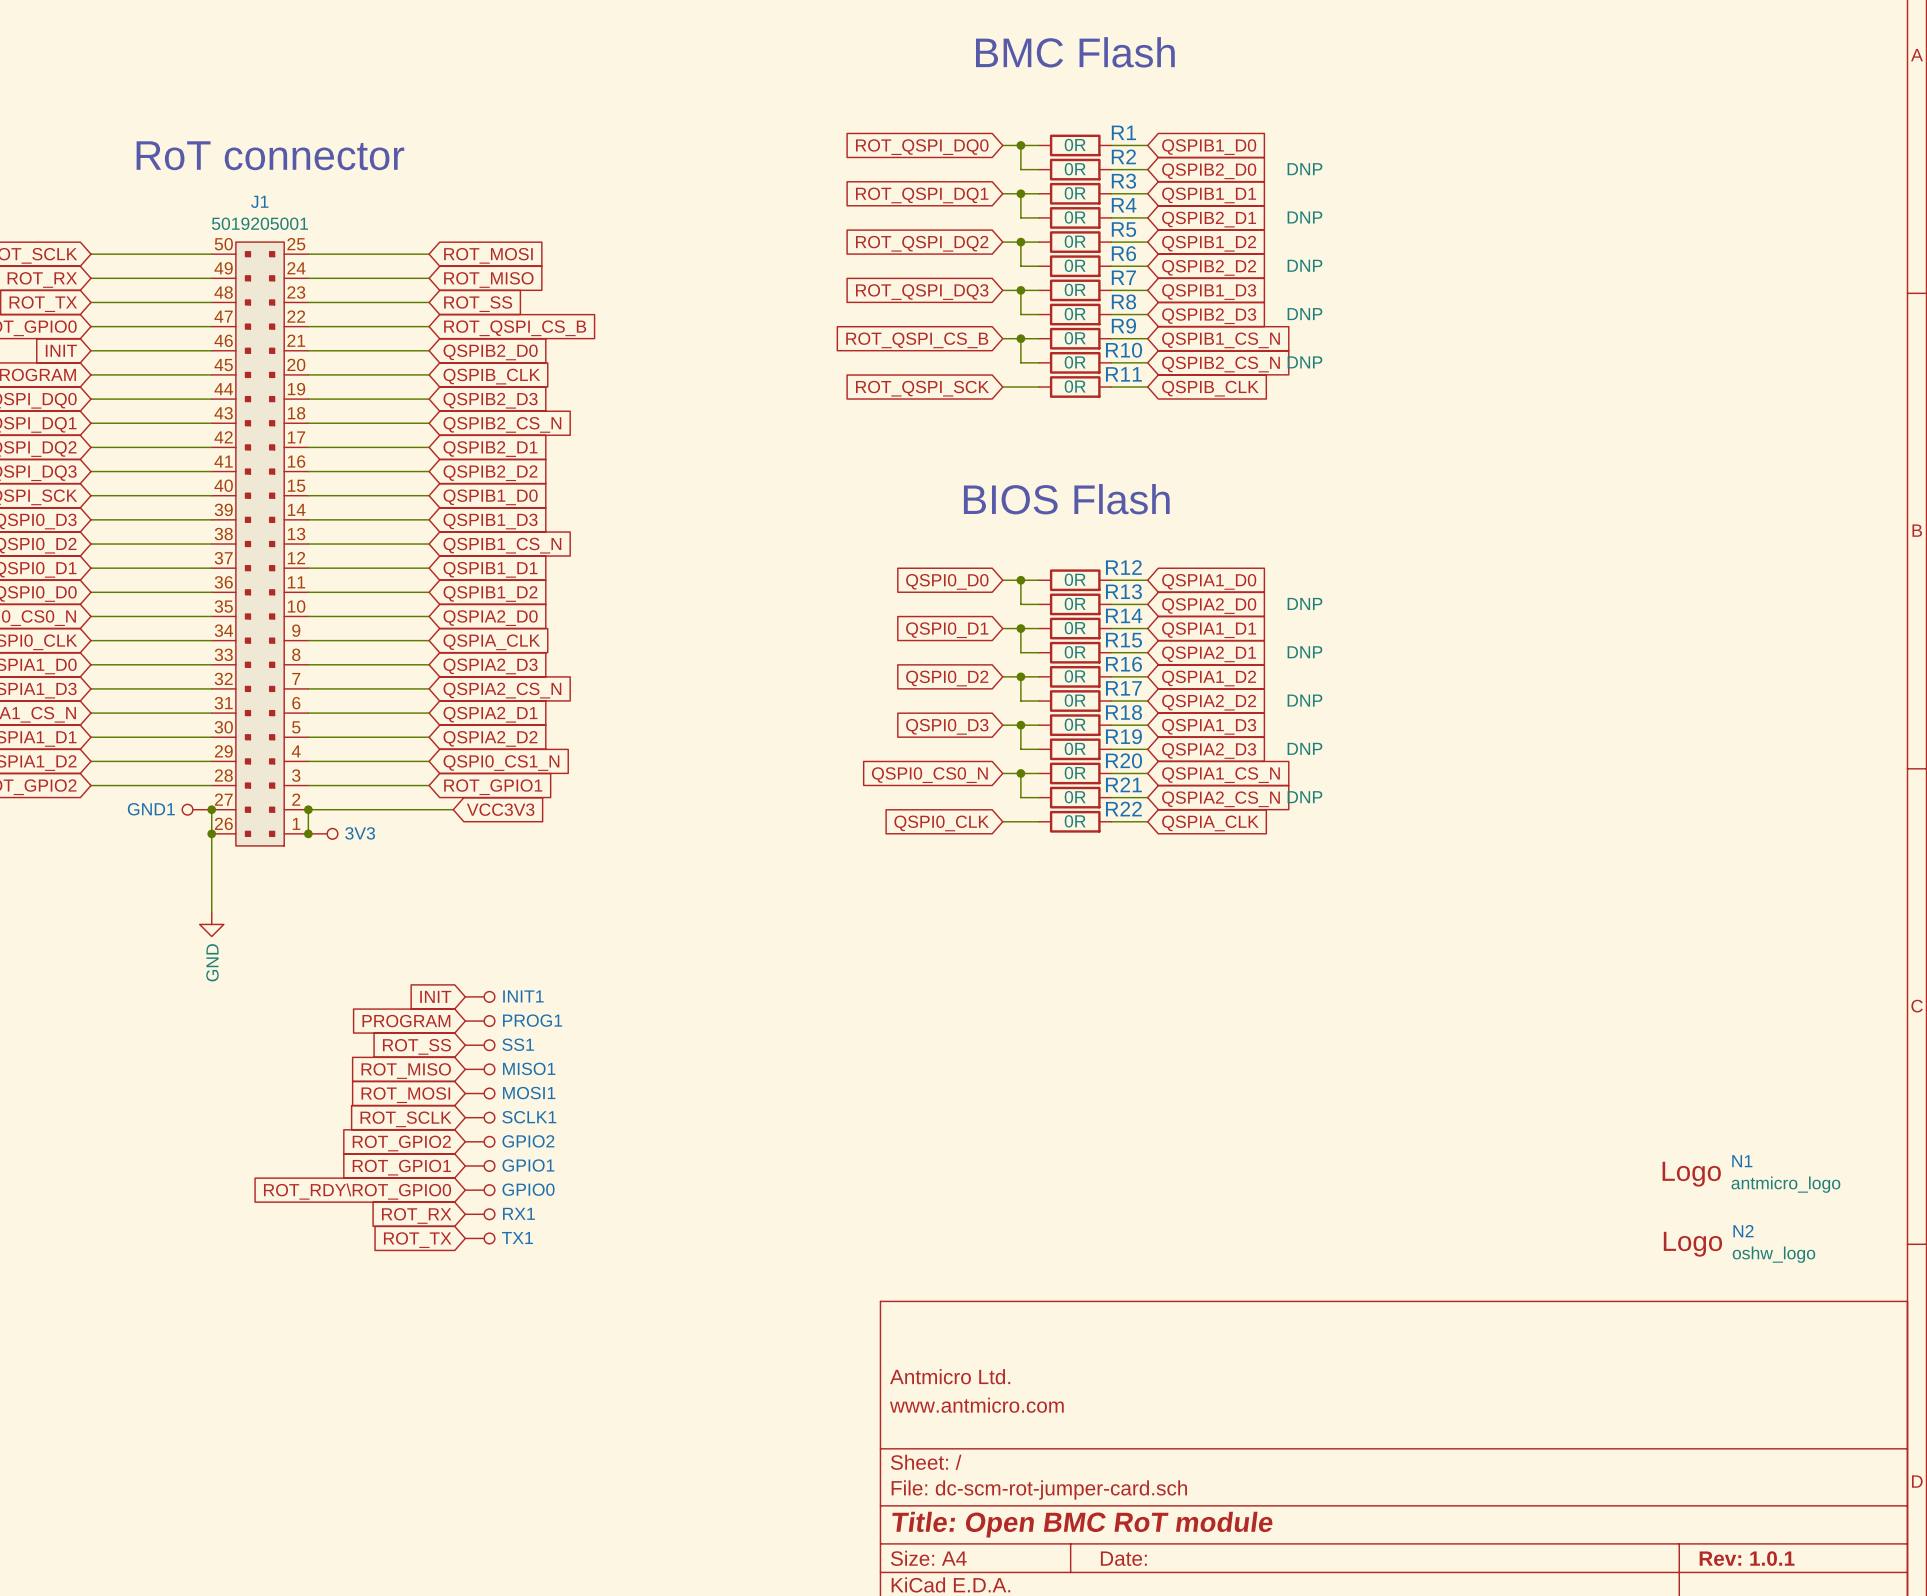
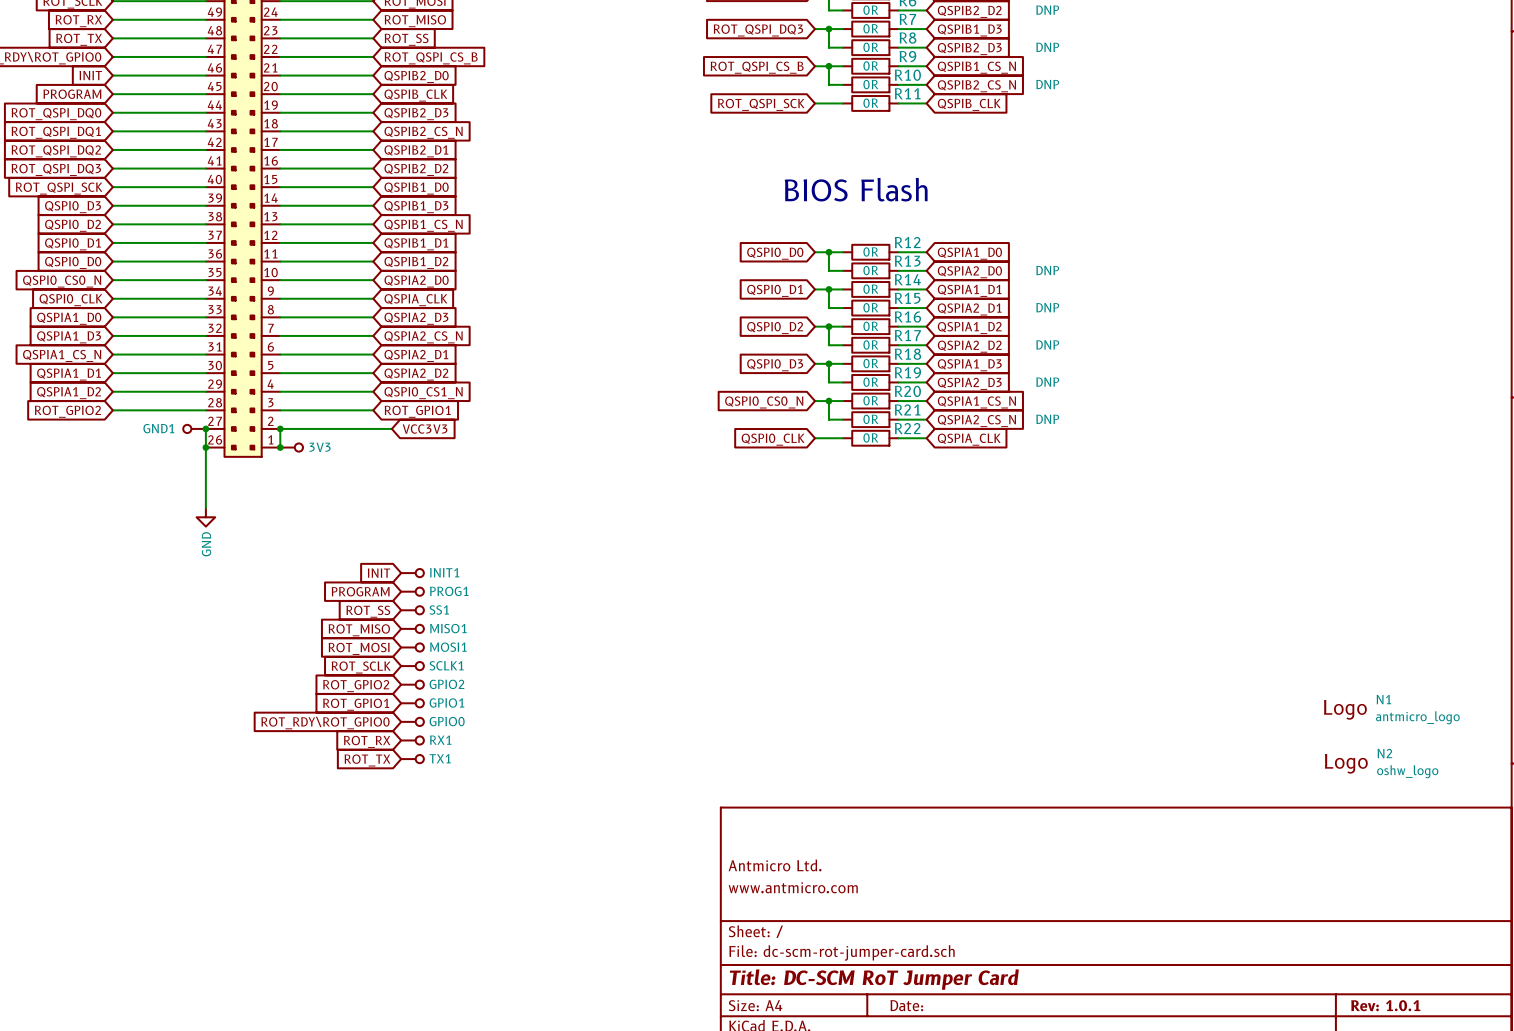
title block: Title: Open BMC RoT module (1082, 1524) -> Title: DC-SCM RoT Jumper Card (874, 979)

